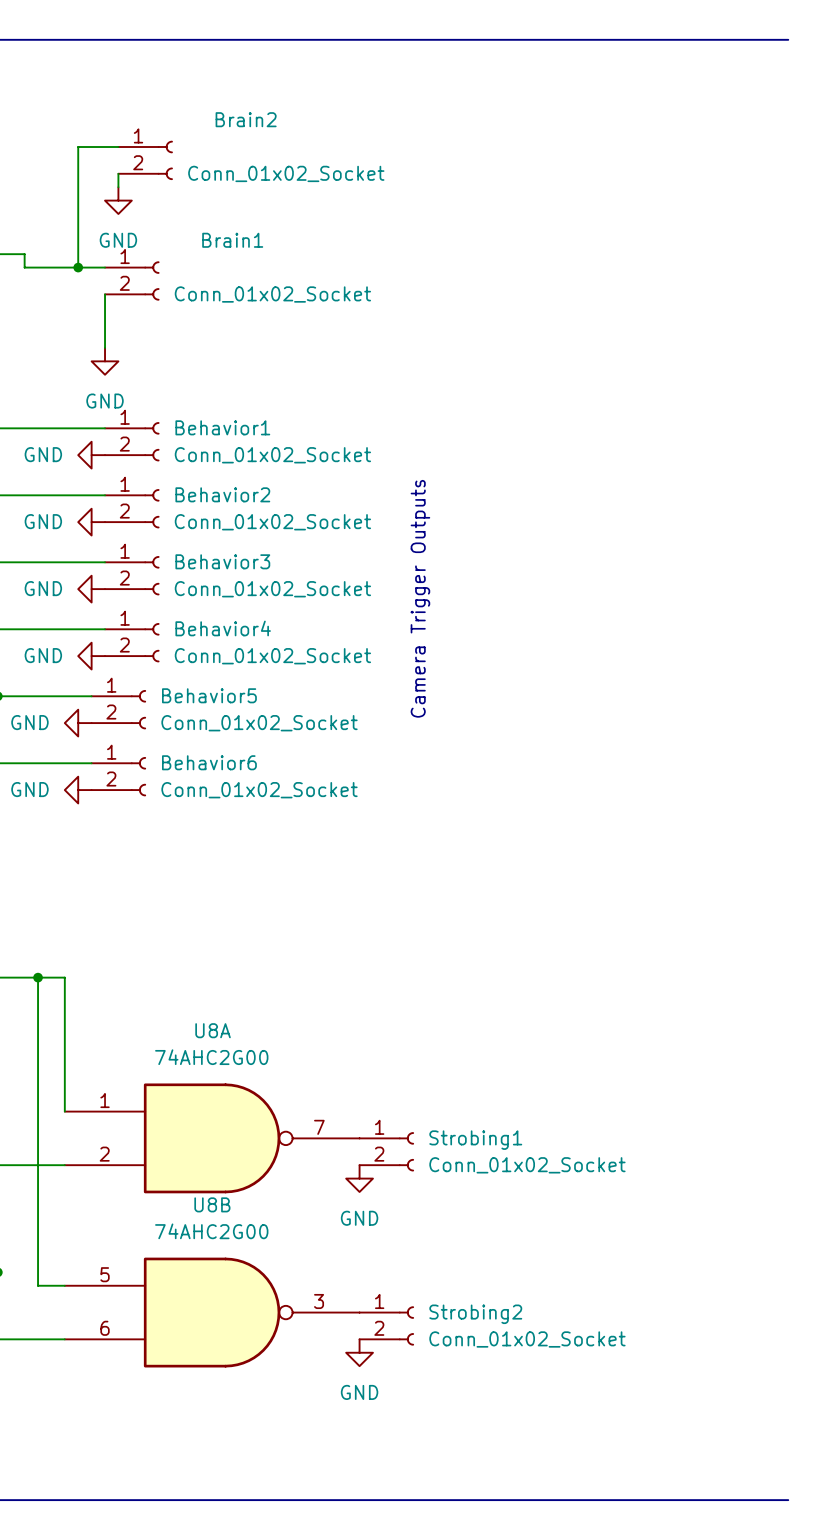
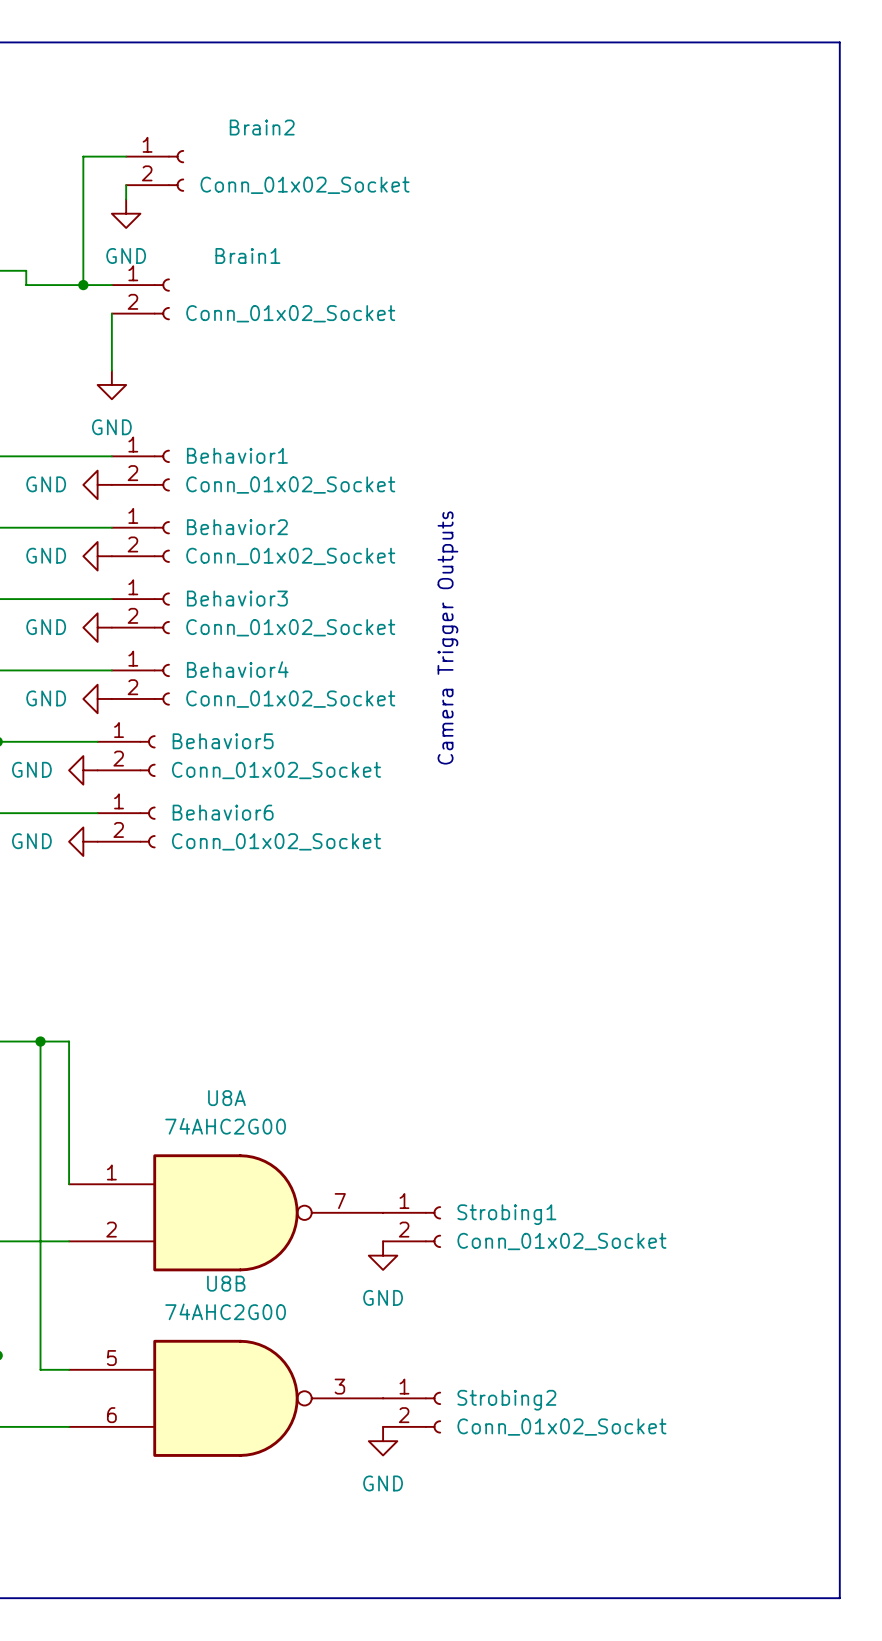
line: none -> (839, 42) (839, 1598)

